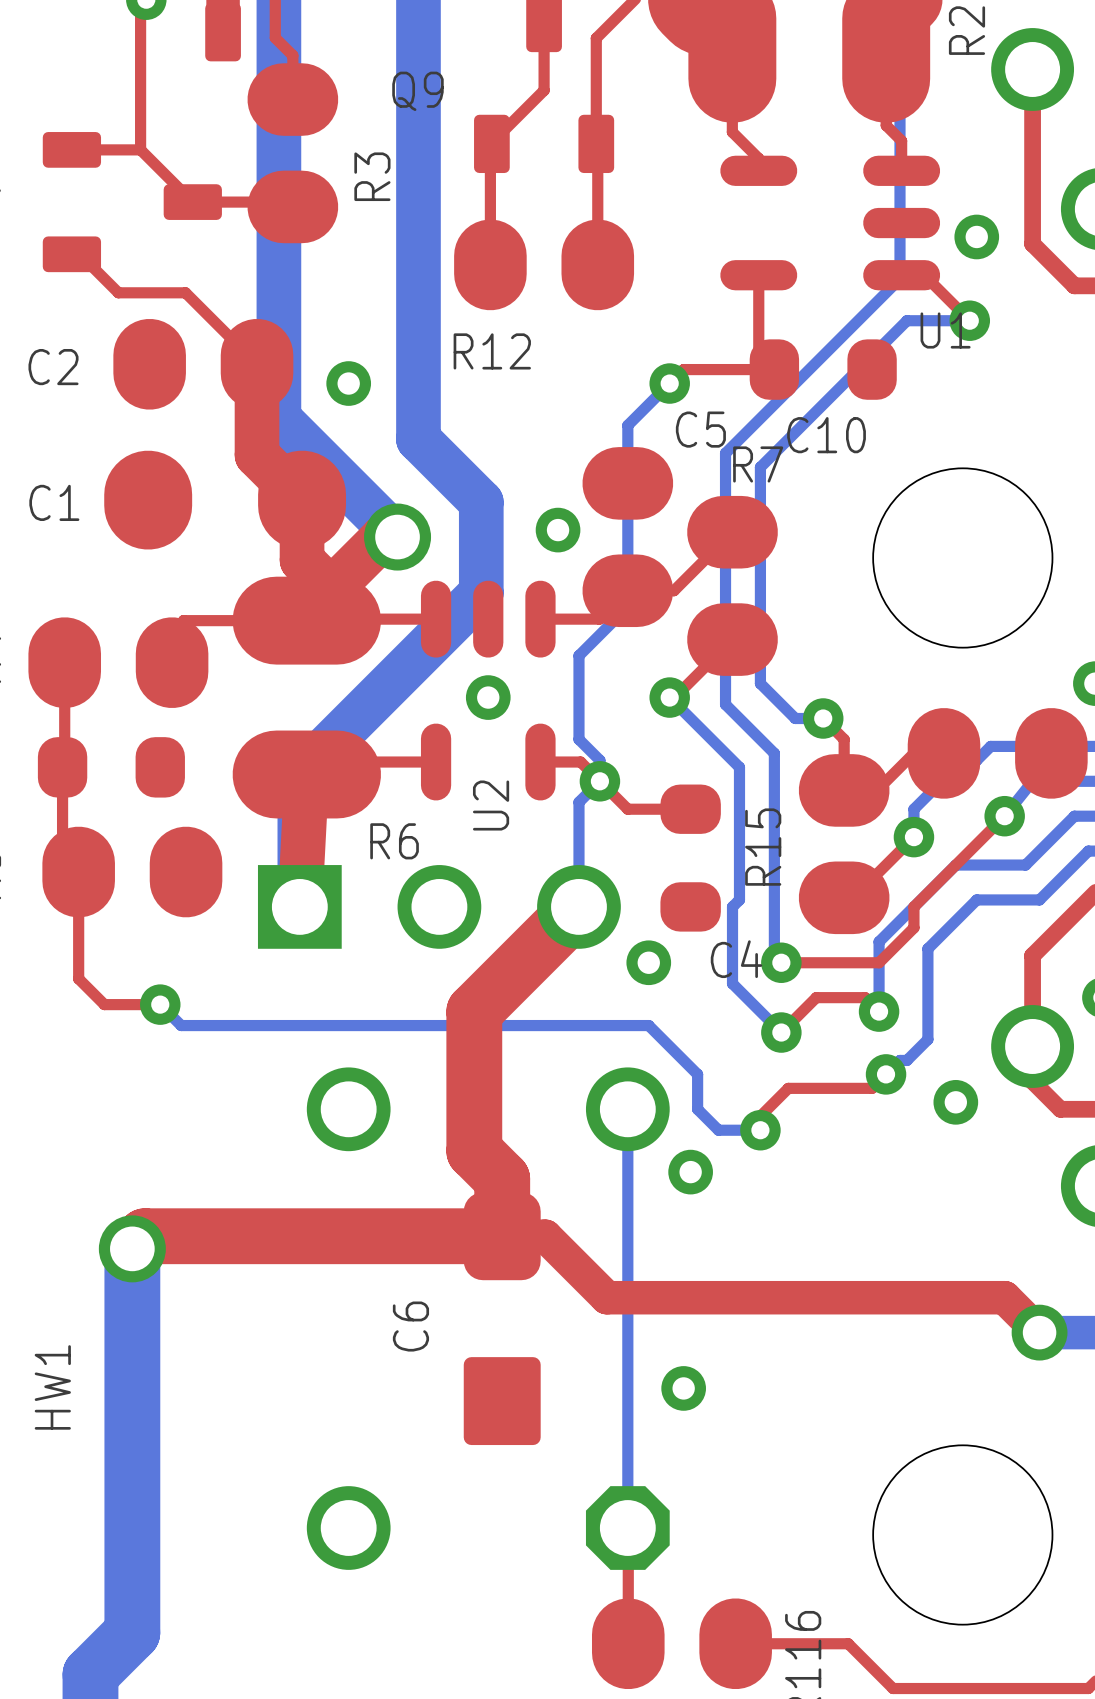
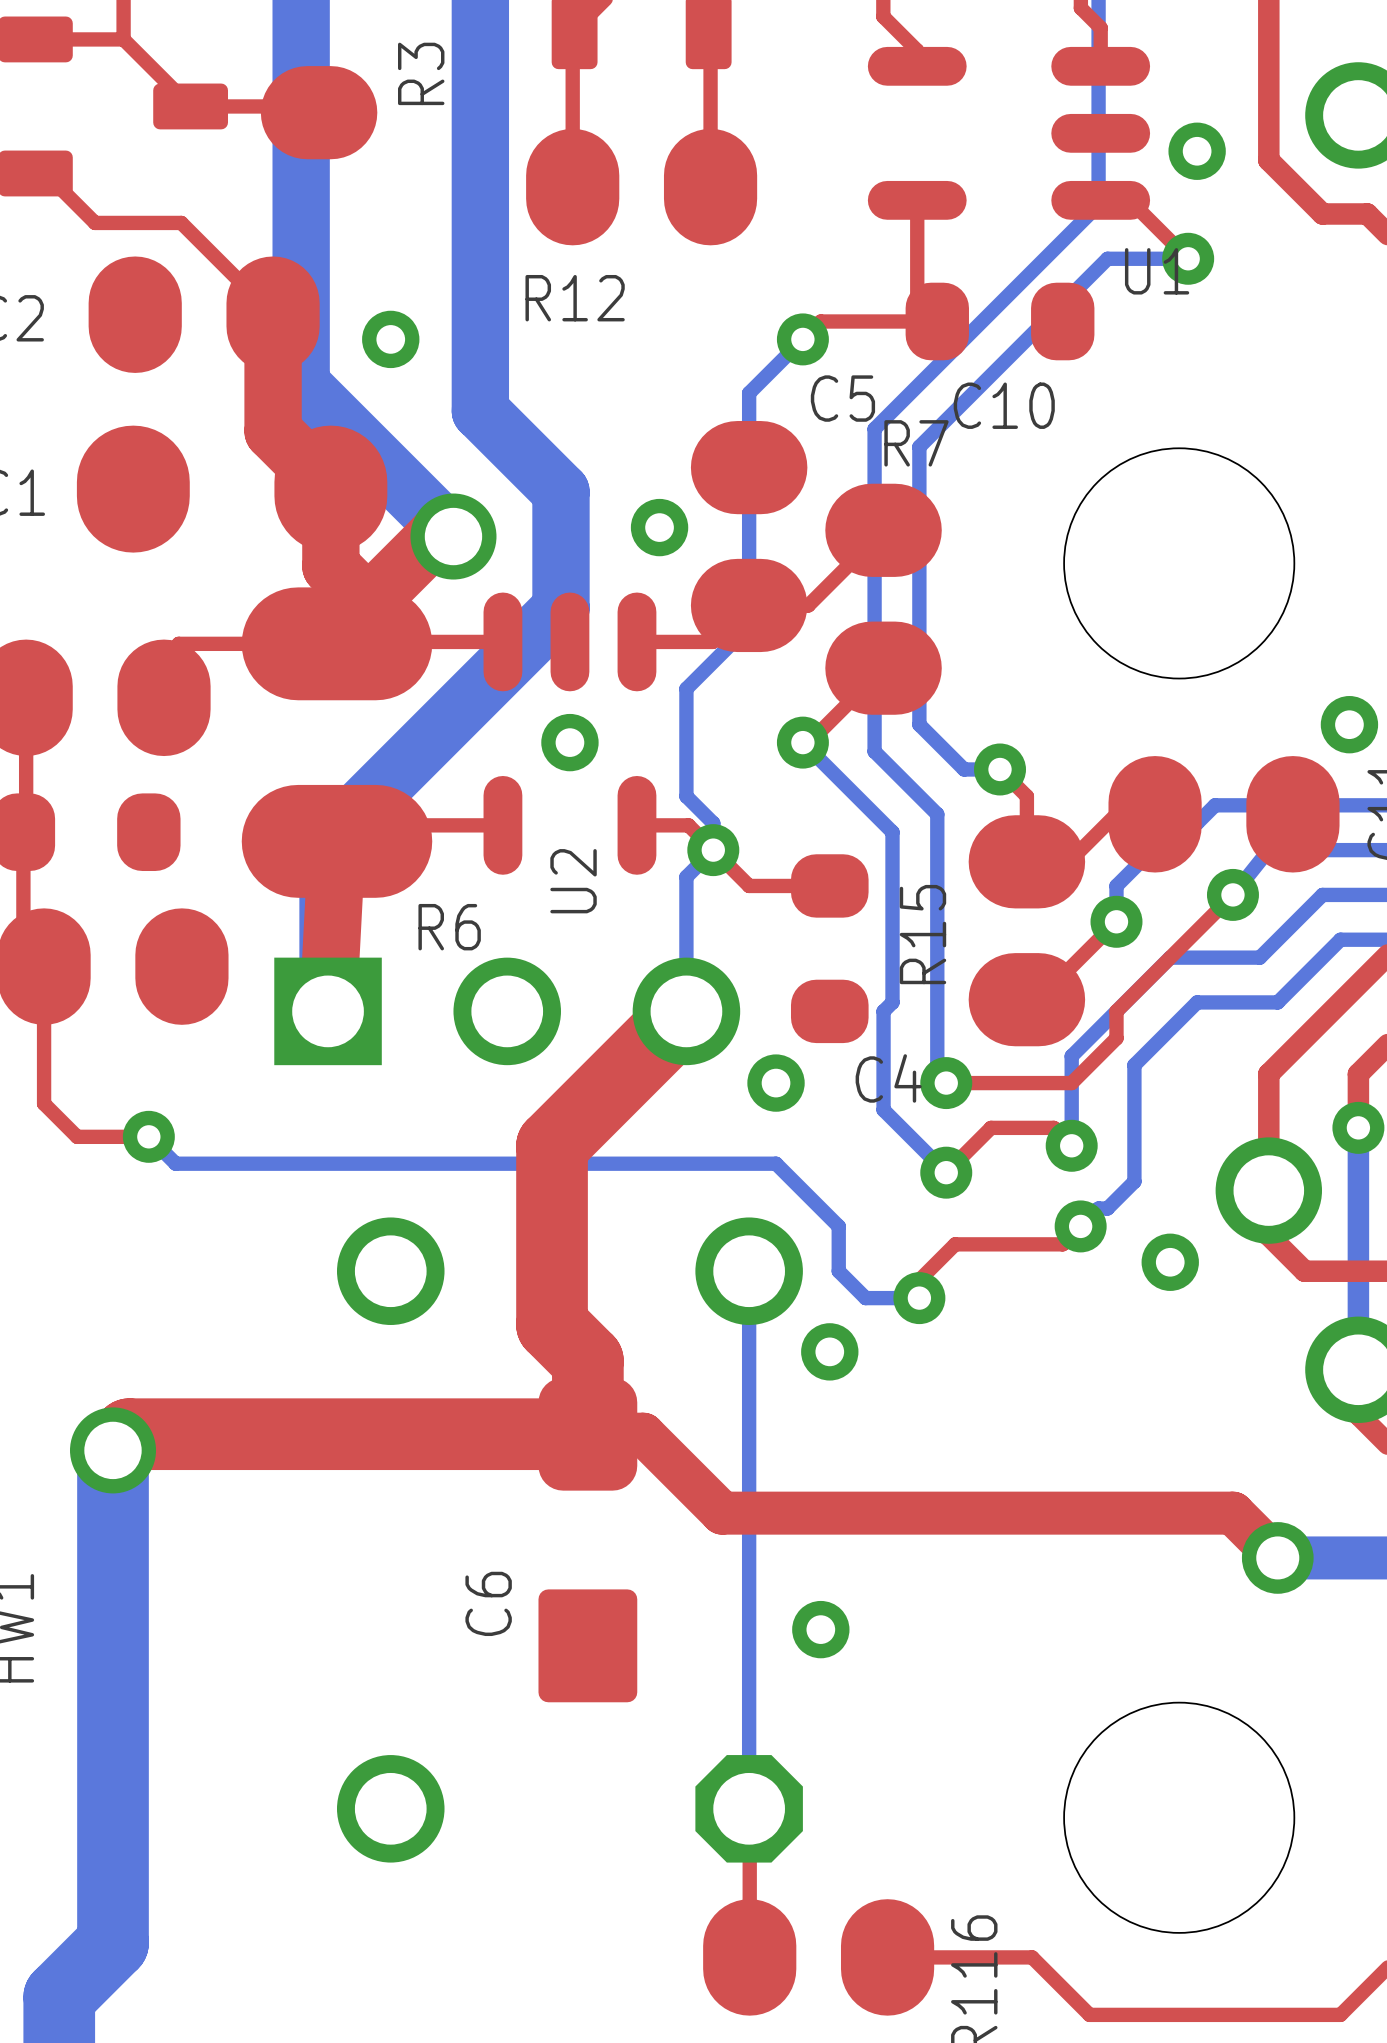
C6 name position: C6 (410, 1326) -> C6 (488, 1603)

